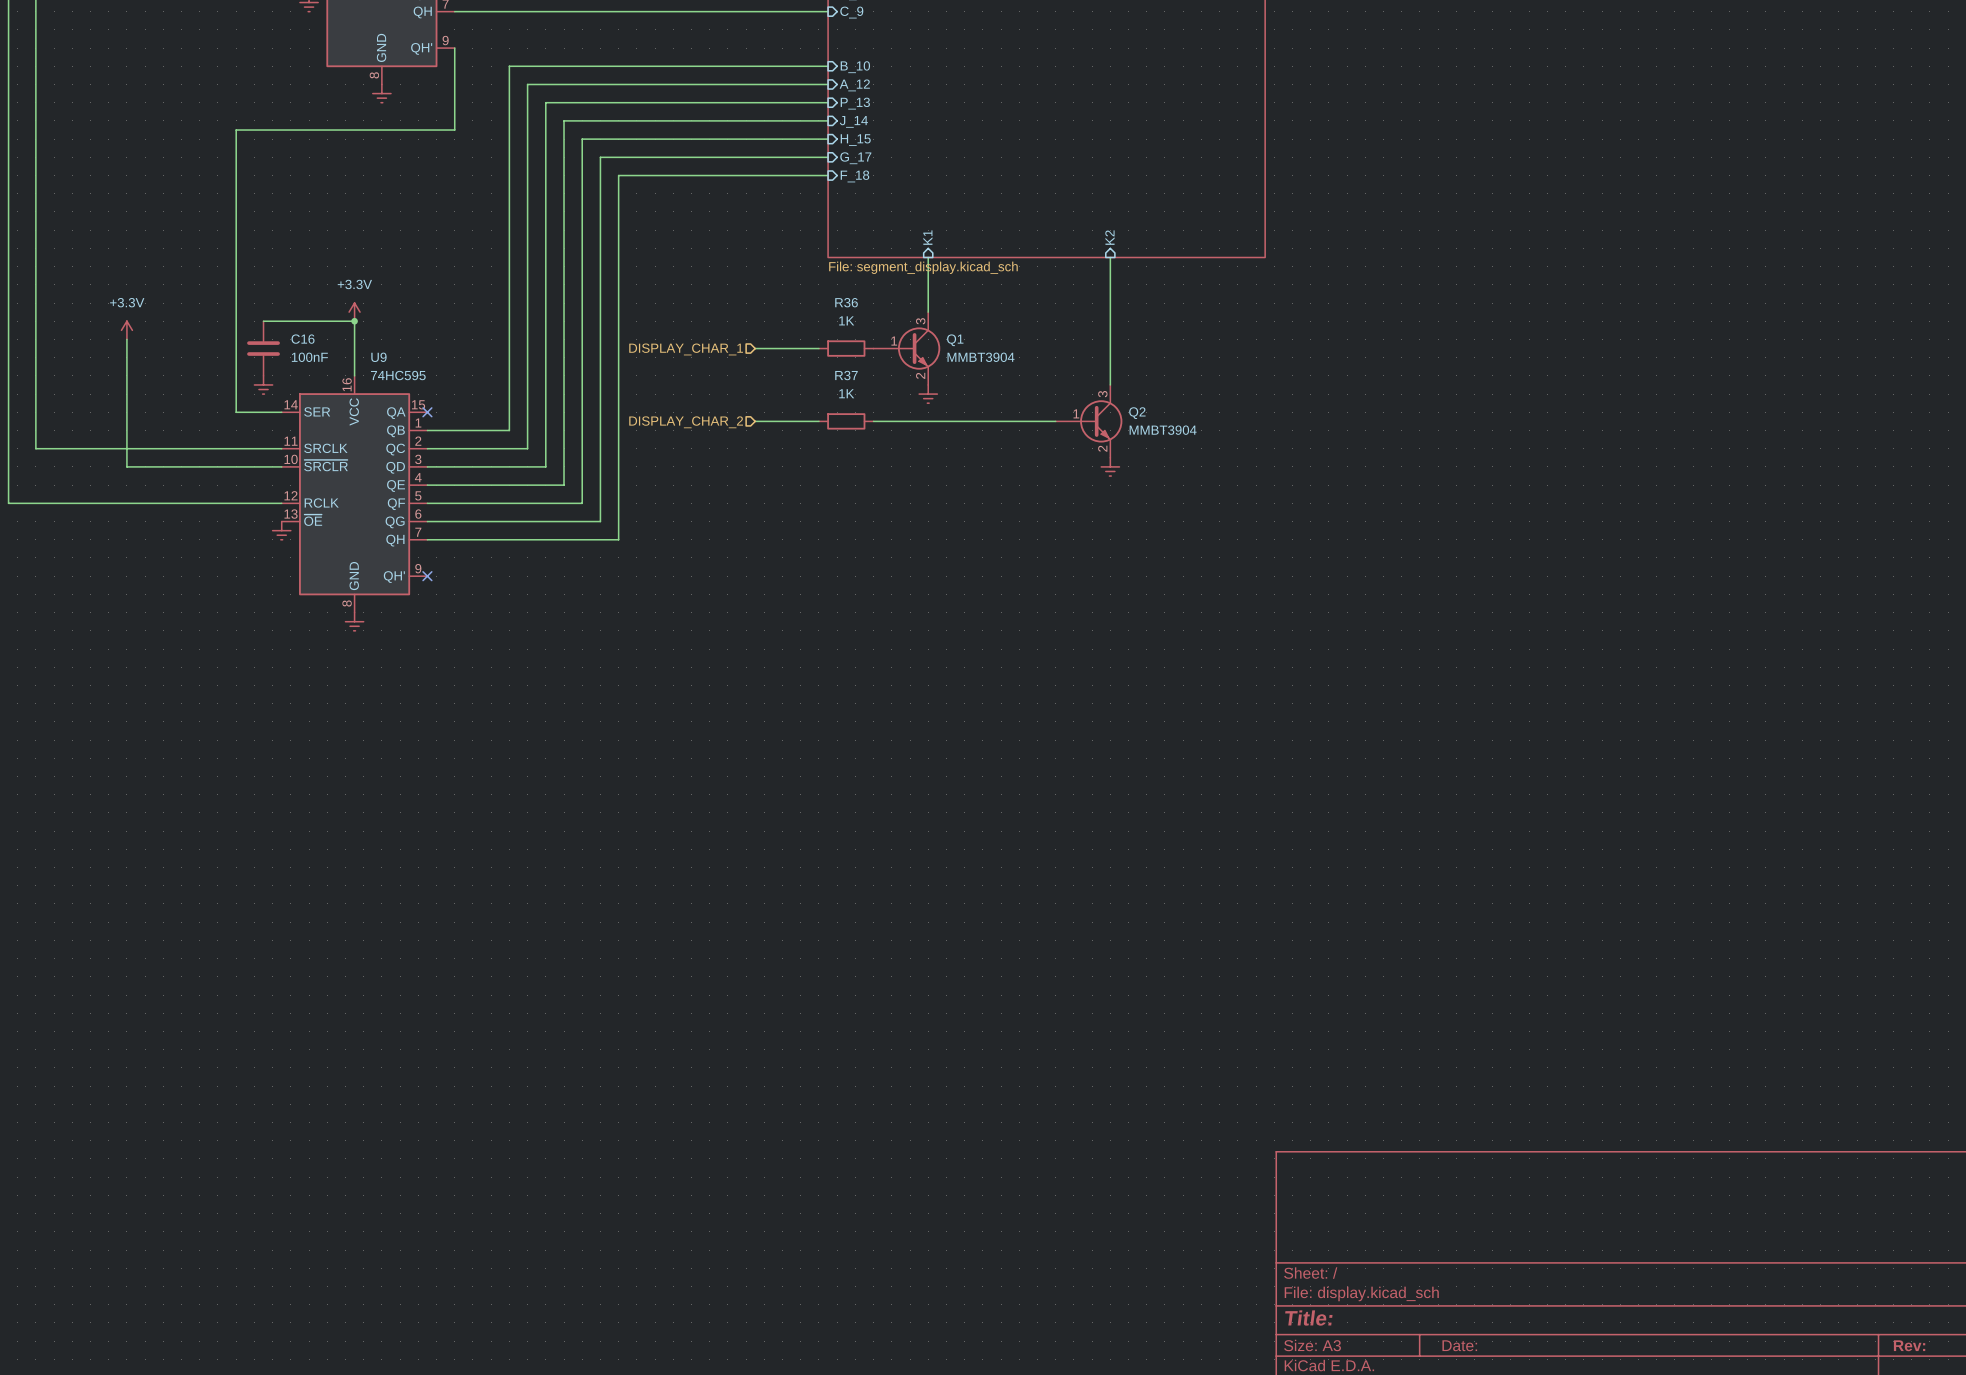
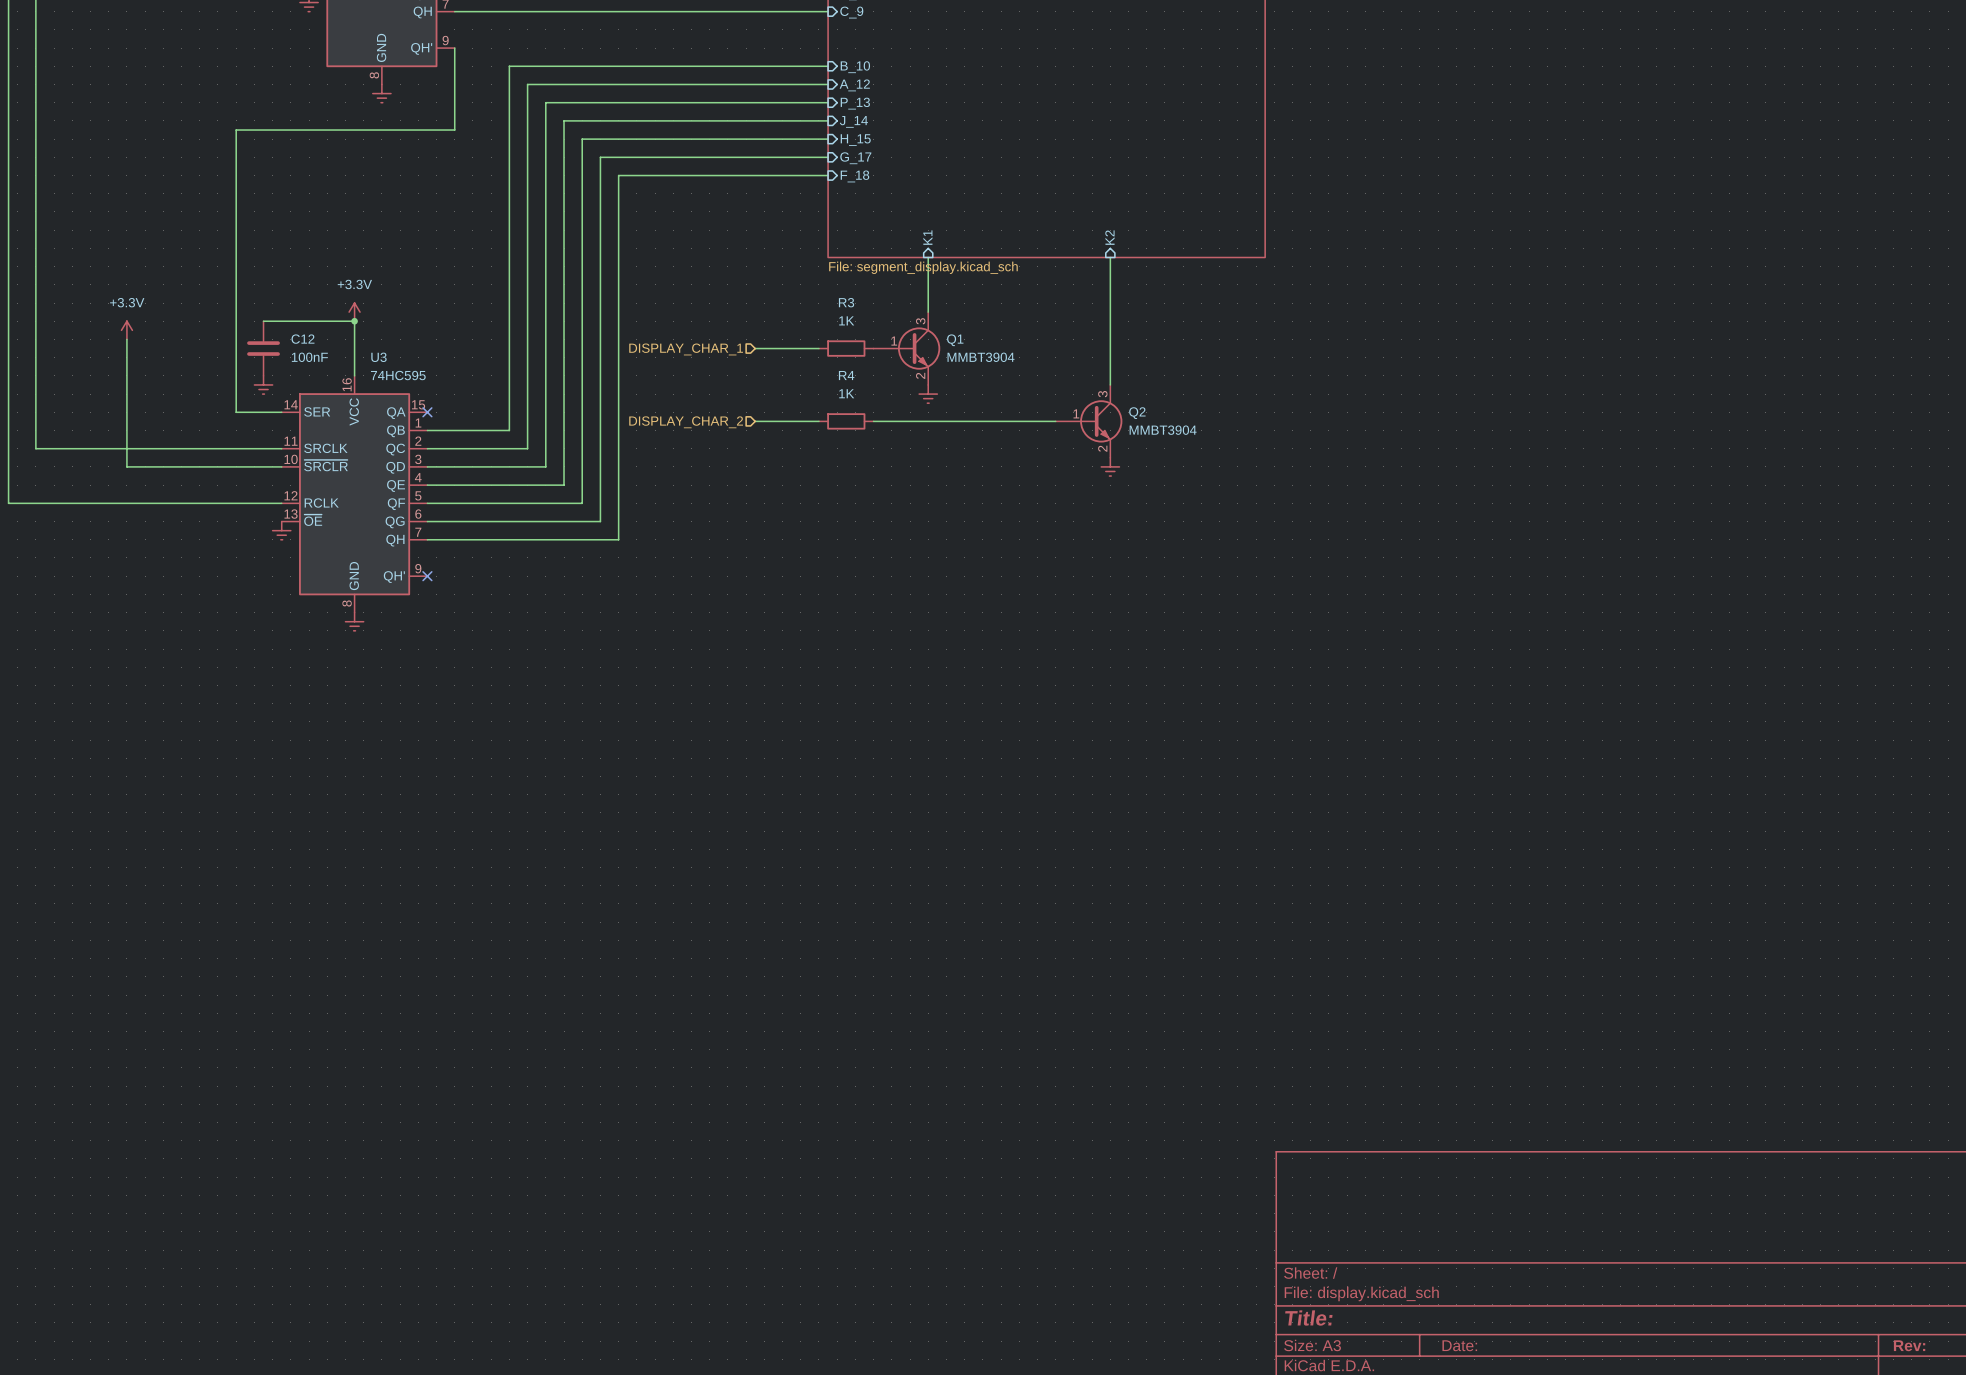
R36 name: R36 (846, 302) -> R3 (846, 302)
C16 name: C16 (303, 339) -> C12 (302, 339)
U9 name: U9 (378, 357) -> U3 (378, 357)
R37 name: R37 (846, 375) -> R4 (846, 375)

